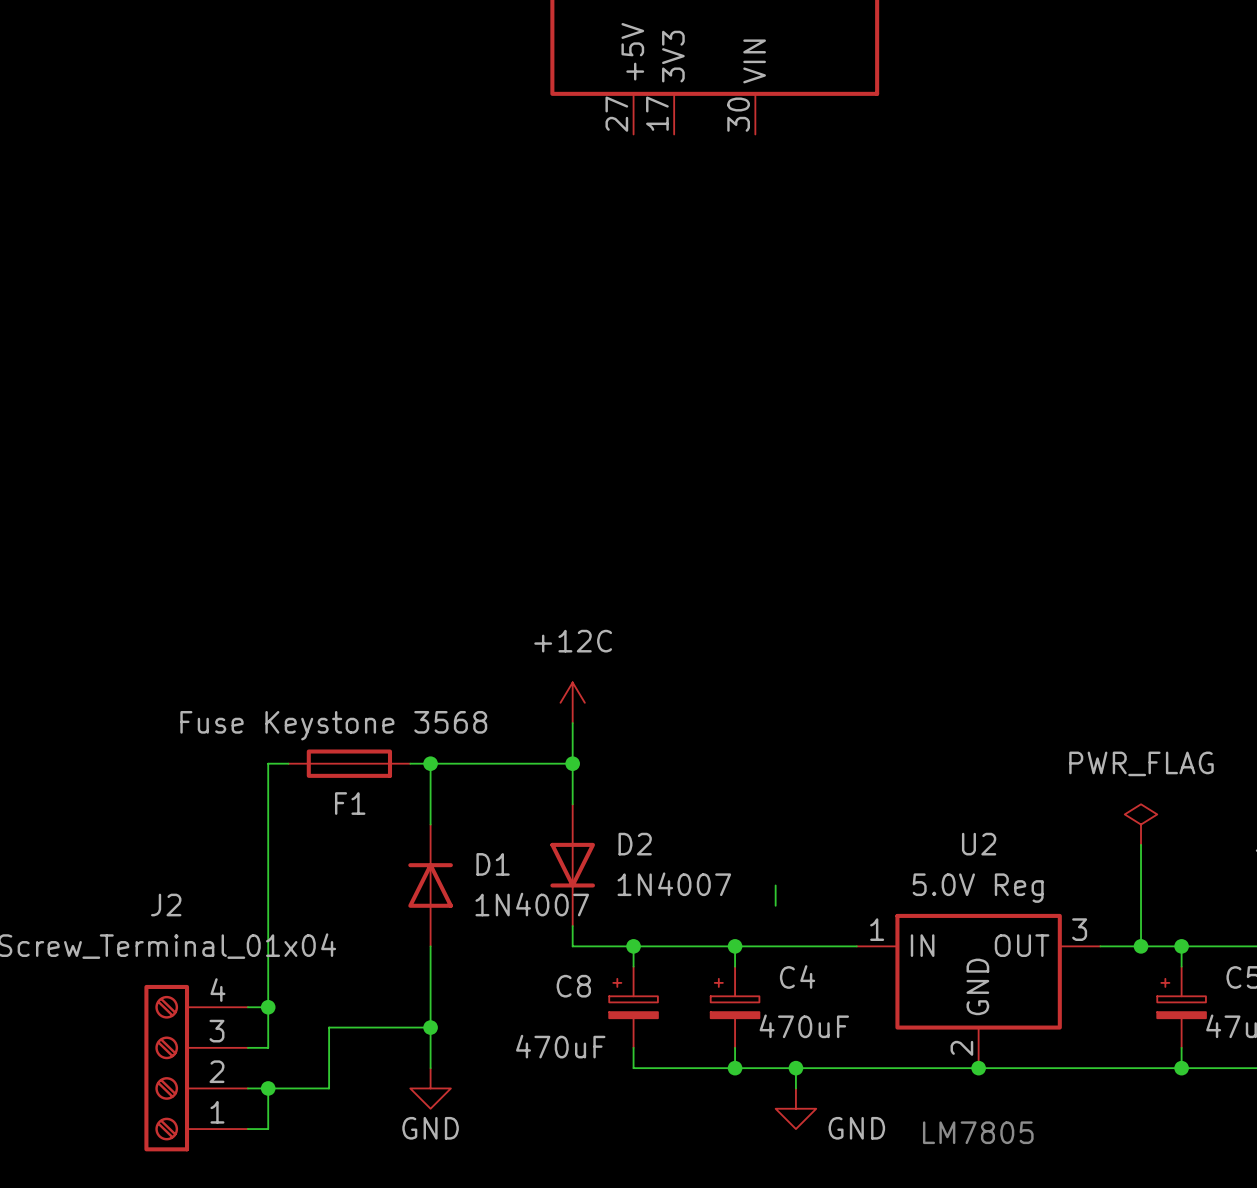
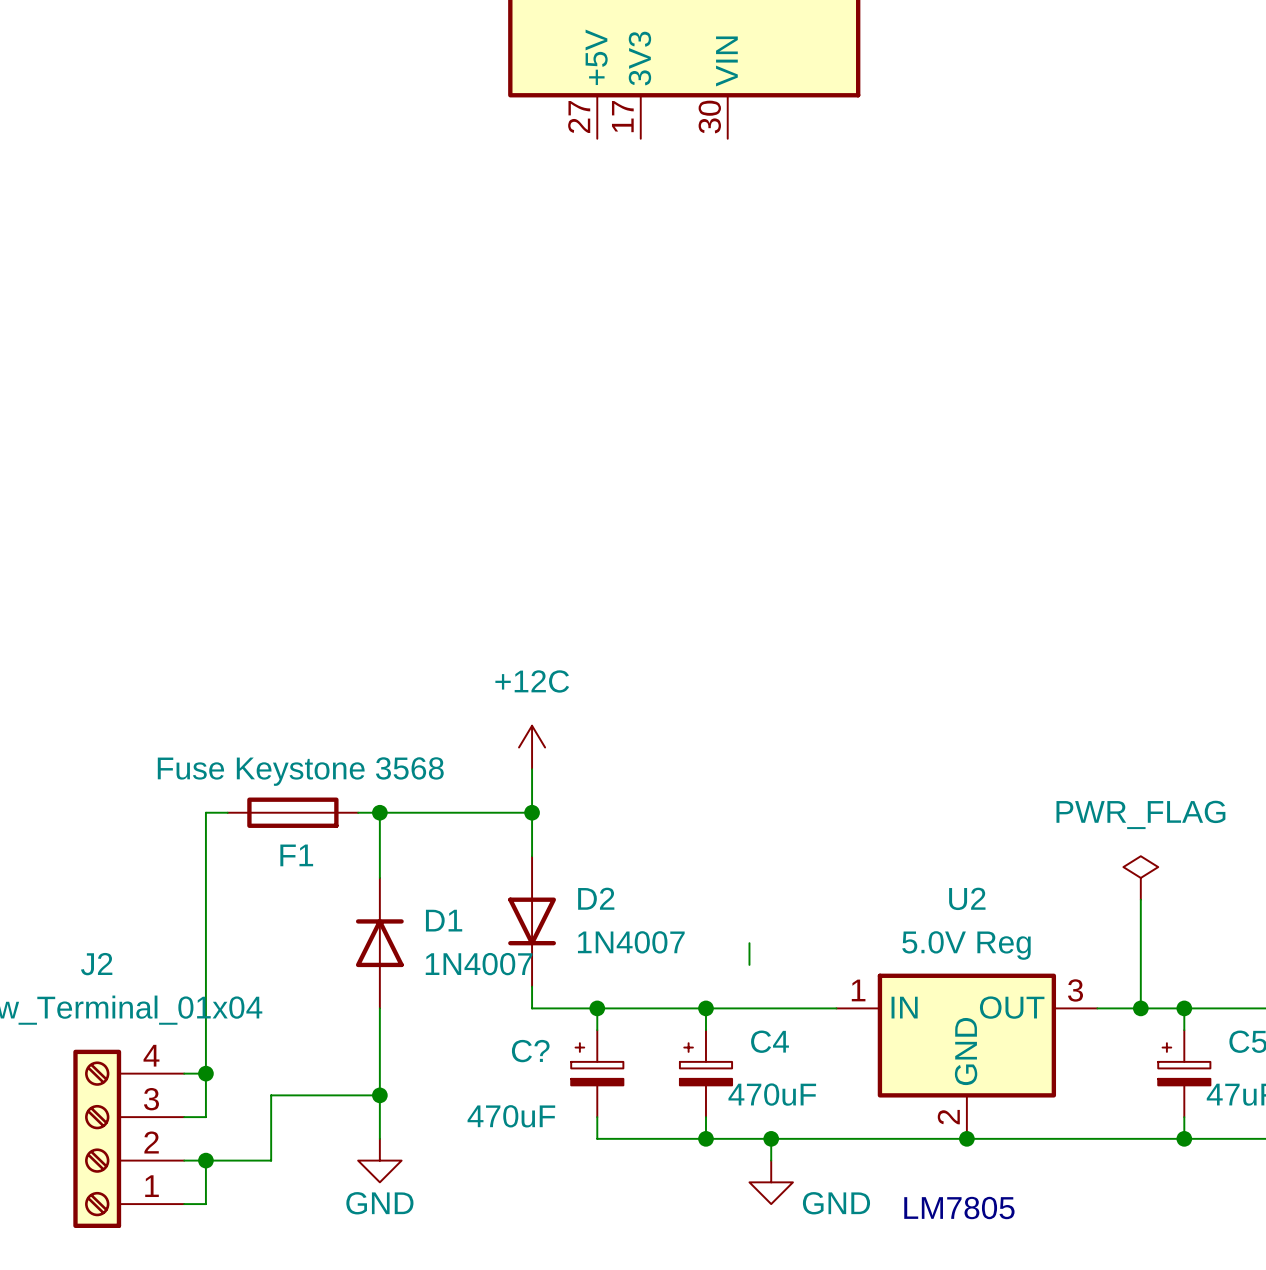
C8 name: C8 (573, 986) -> C? (530, 1051)

